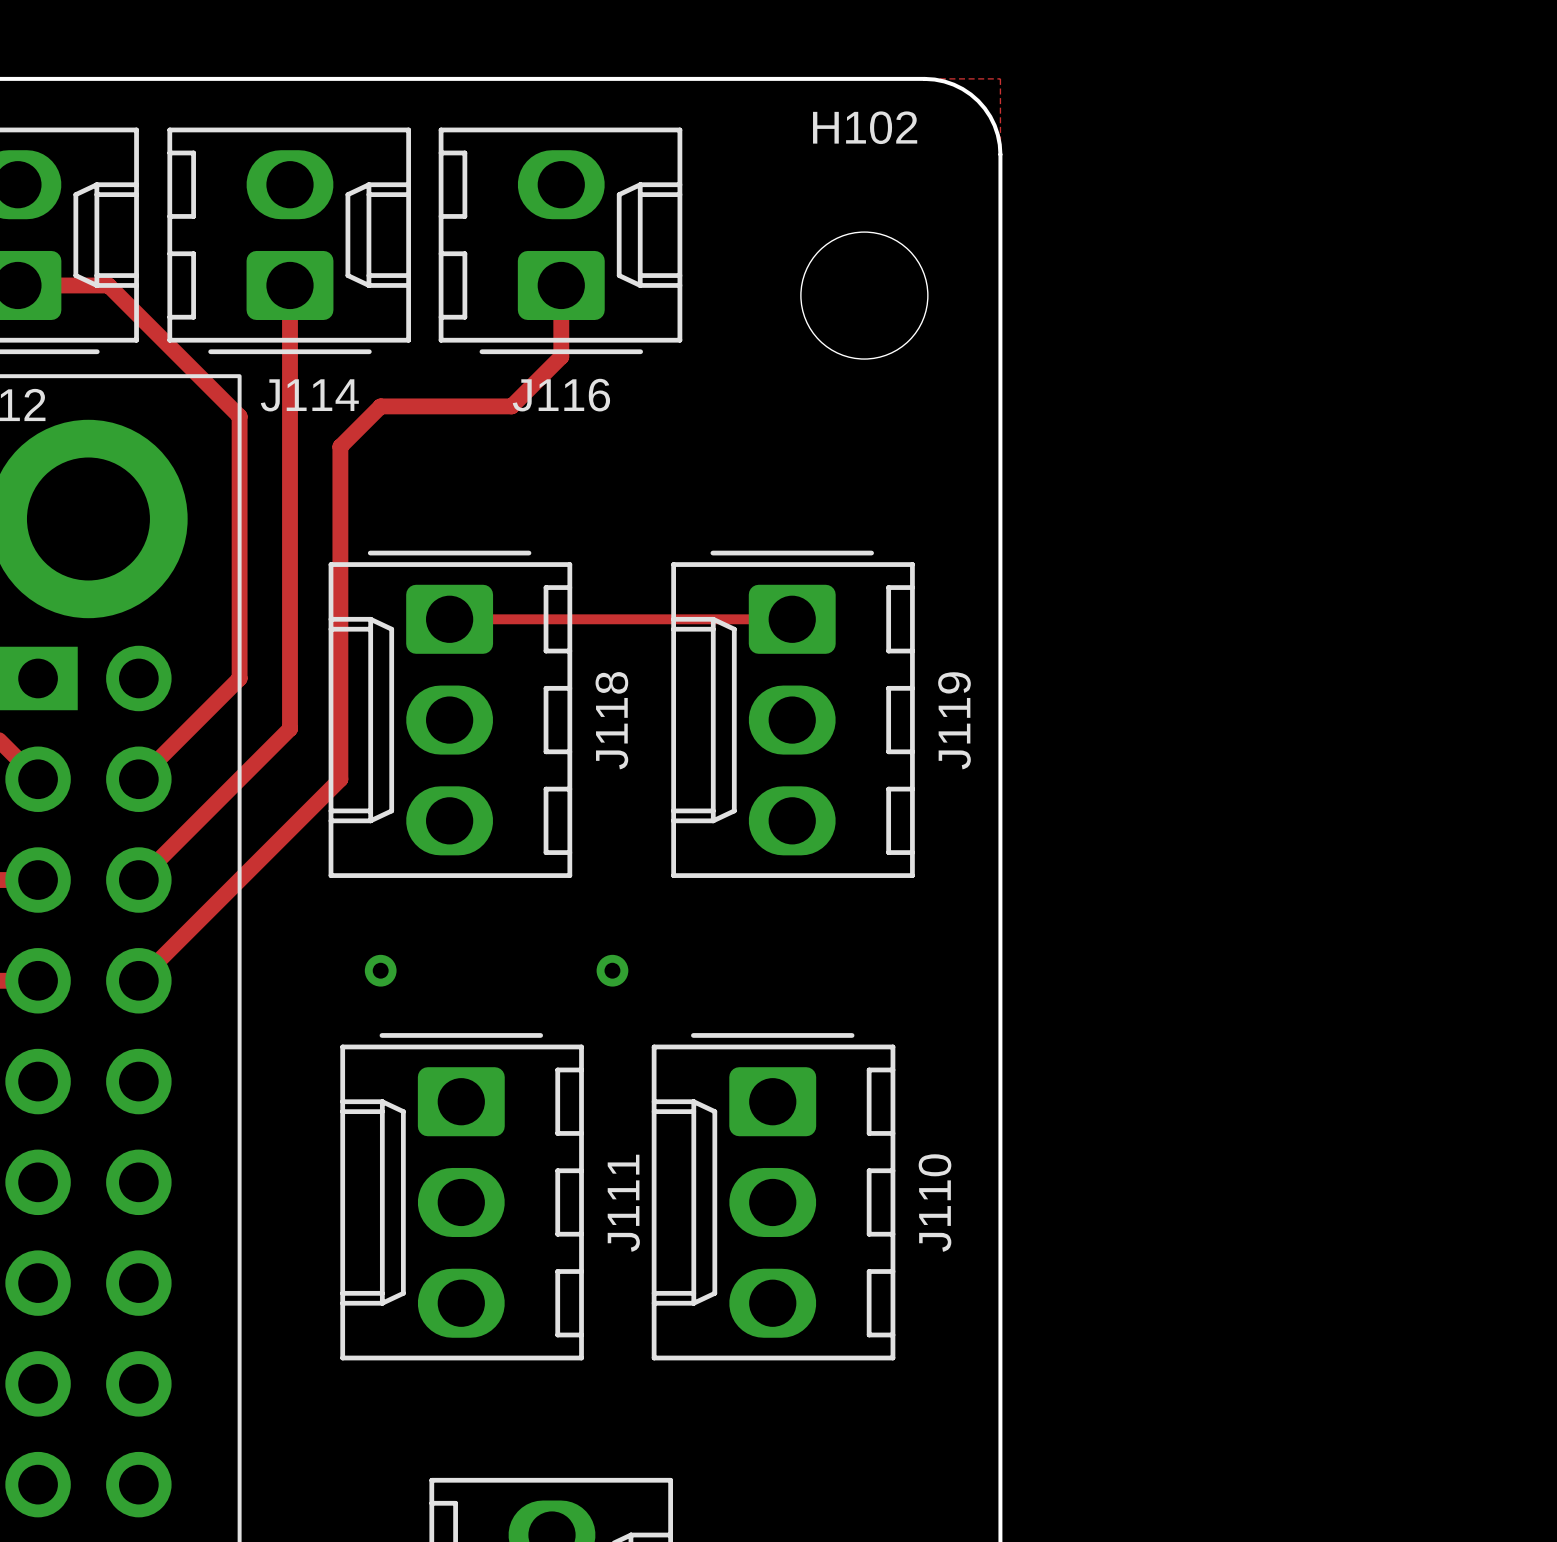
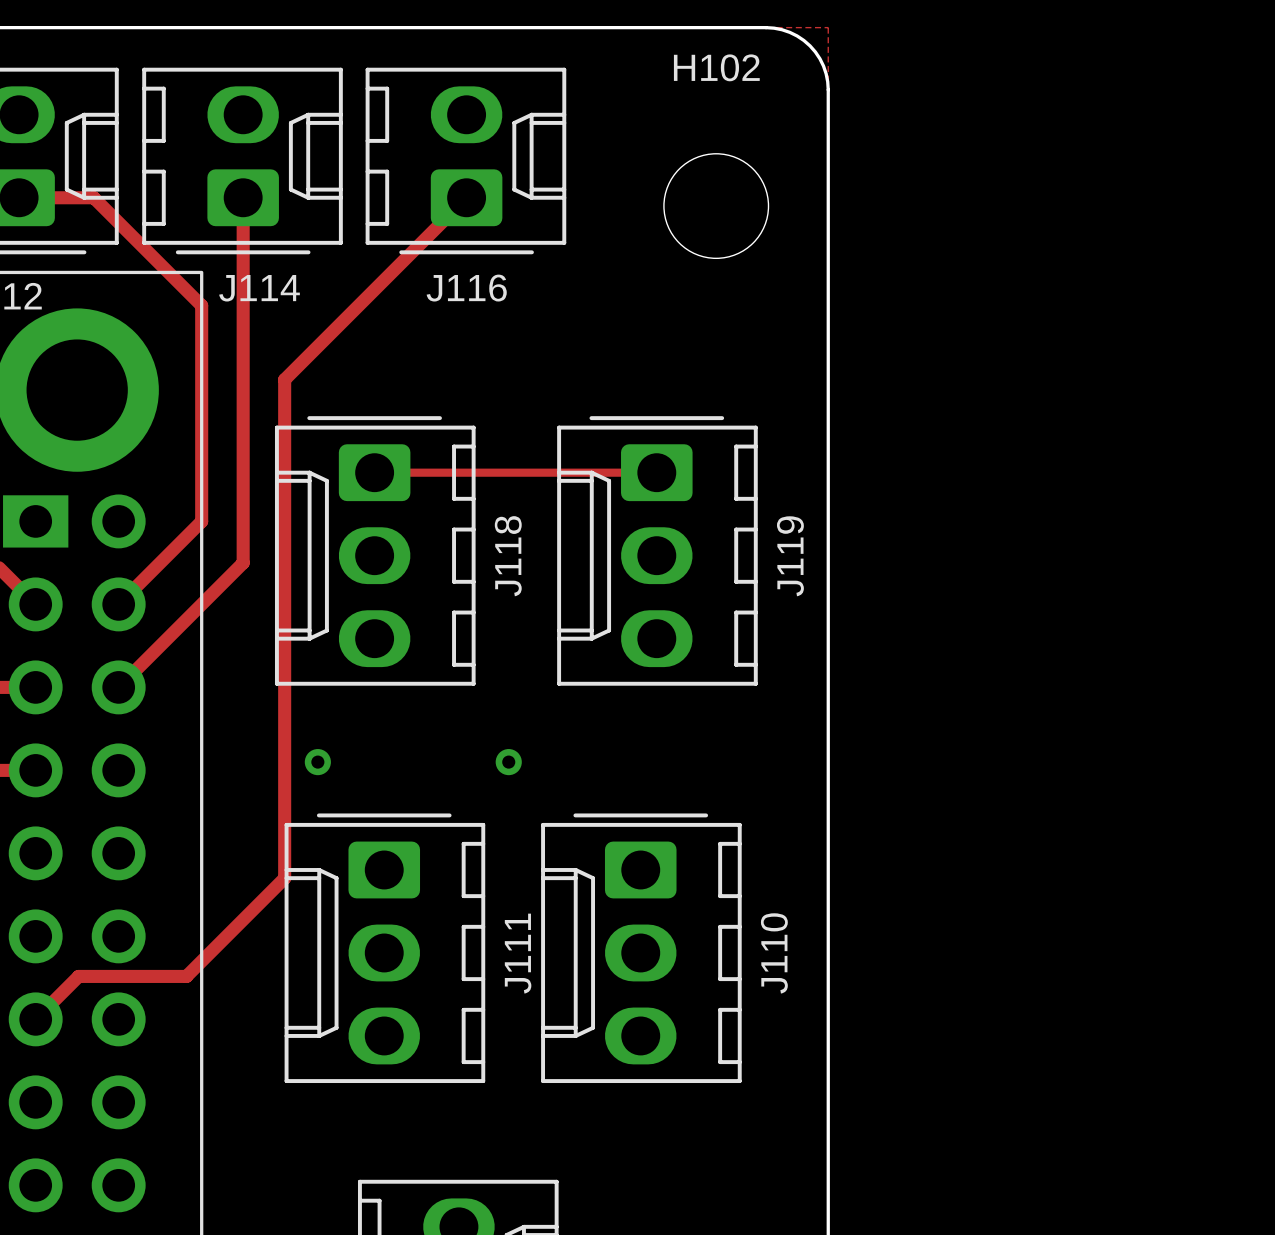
track: (561, 285) (561, 356) (511, 406) (380, 406) (340, 446) (340, 506) -> (466, 197) (284, 379)
track: (340, 779) (138, 980) -> (284, 604) (284, 878) (186, 976) (78, 976) (35, 1019)

